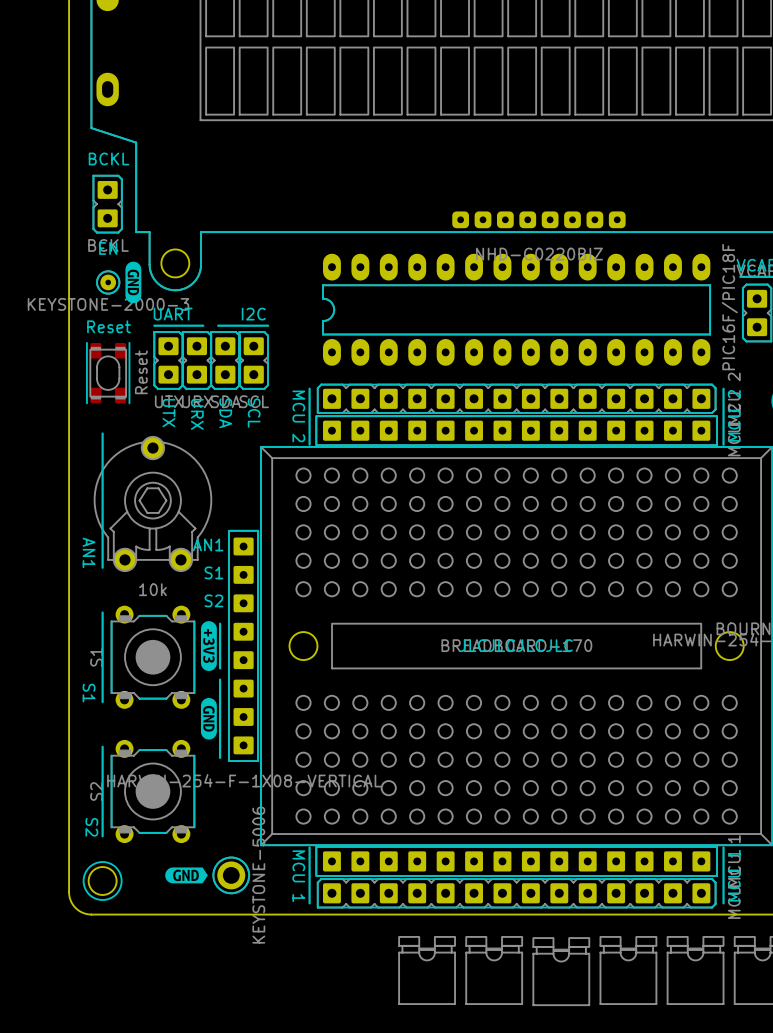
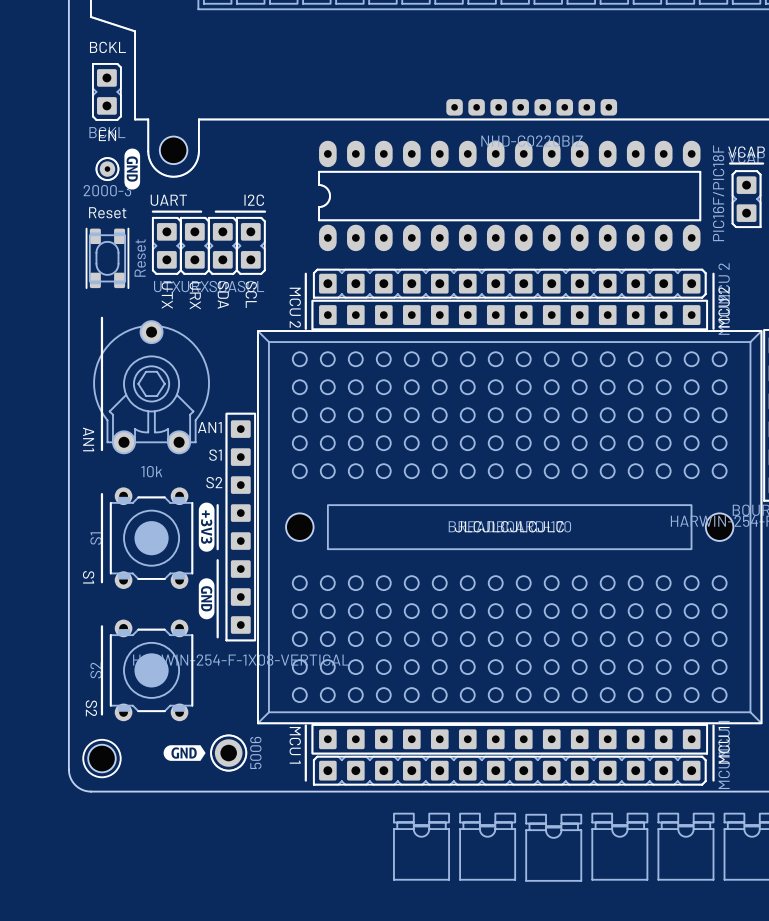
part value: KEYSTONE-2000-3 (108, 304) -> 2000-3 (107, 190)
part value: KEYSTONE-5006 (258, 875) -> 5006 (255, 752)

